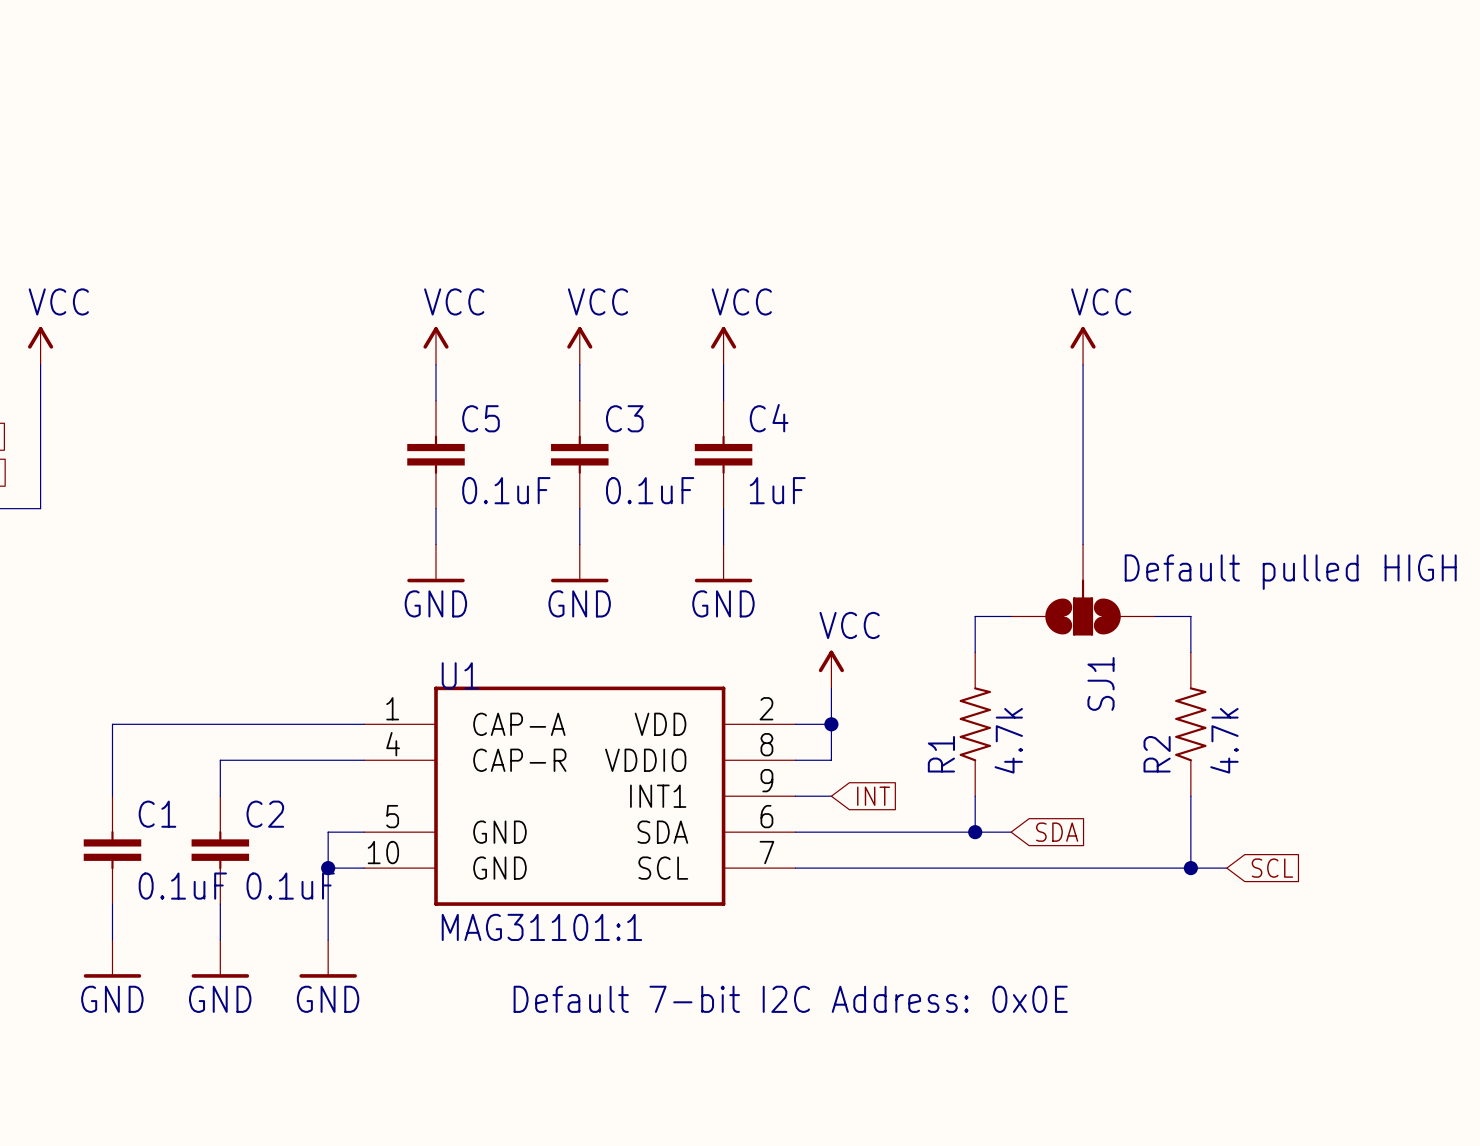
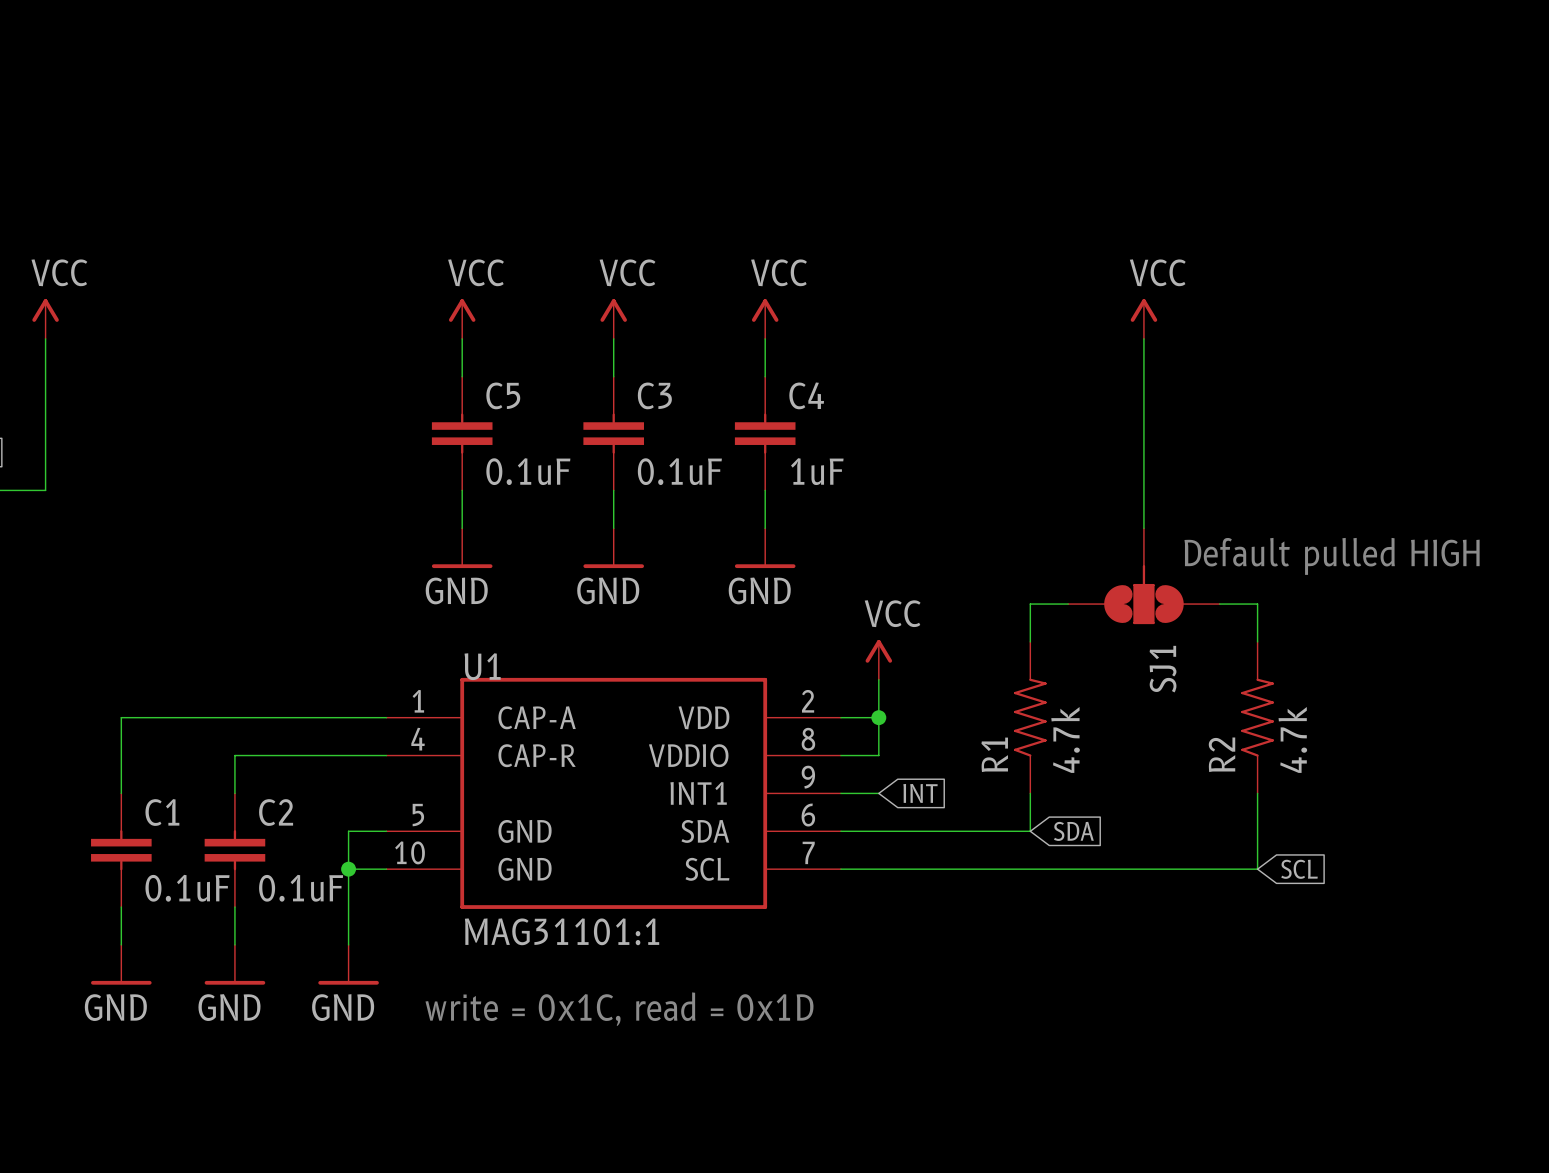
wire: (975, 832) (1011, 832) -> none
junction: (975, 832) -> none
global label position: SDA (1057, 832) -> SDA (1073, 831)
wire: (1190, 868) (1226, 868) -> none
junction: (1190, 868) -> none
global label position: SCL (1272, 868) -> SCL (1299, 869)
text: Default 7-bit I2C Address: 0x0E (790, 999) -> none
text: none -> write = 0x1C, read = 0x1D (619, 1009)

